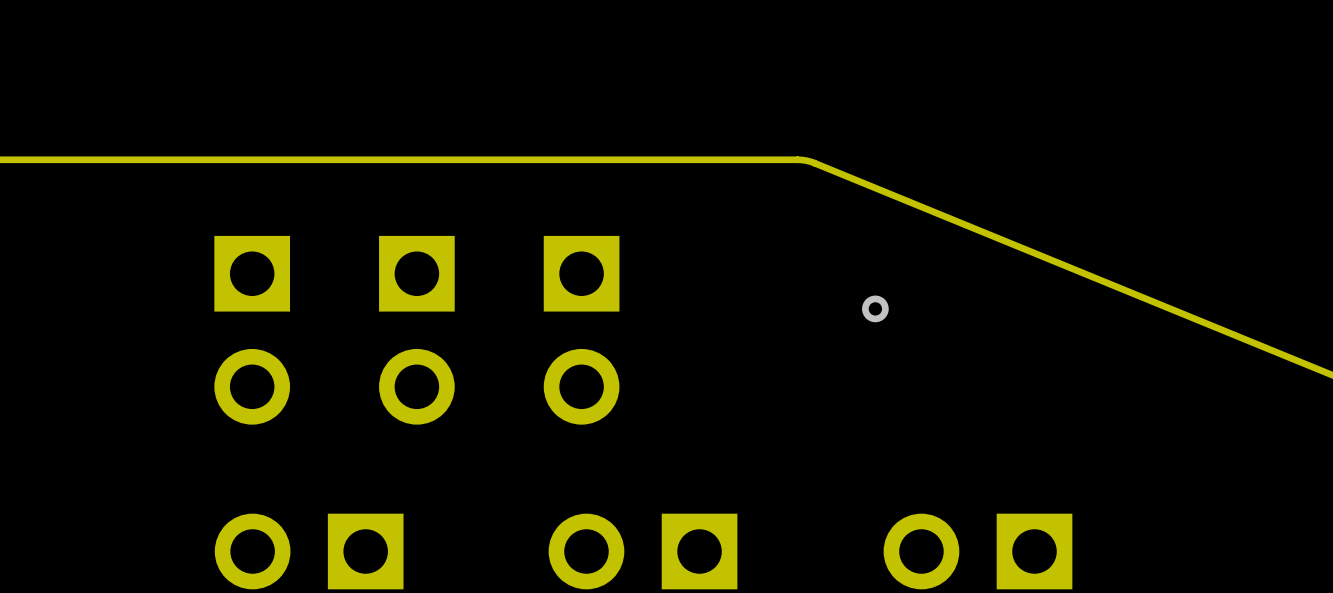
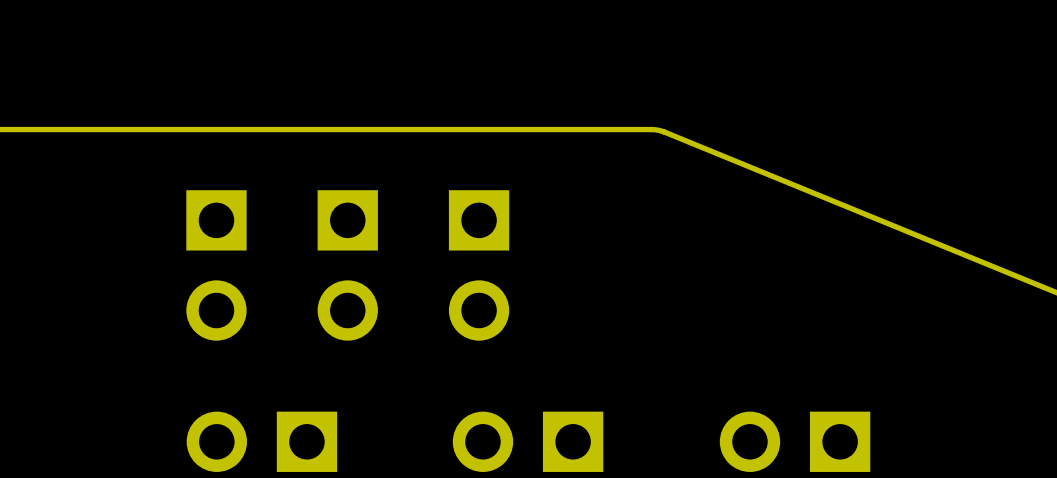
via: (875, 308) -> none

